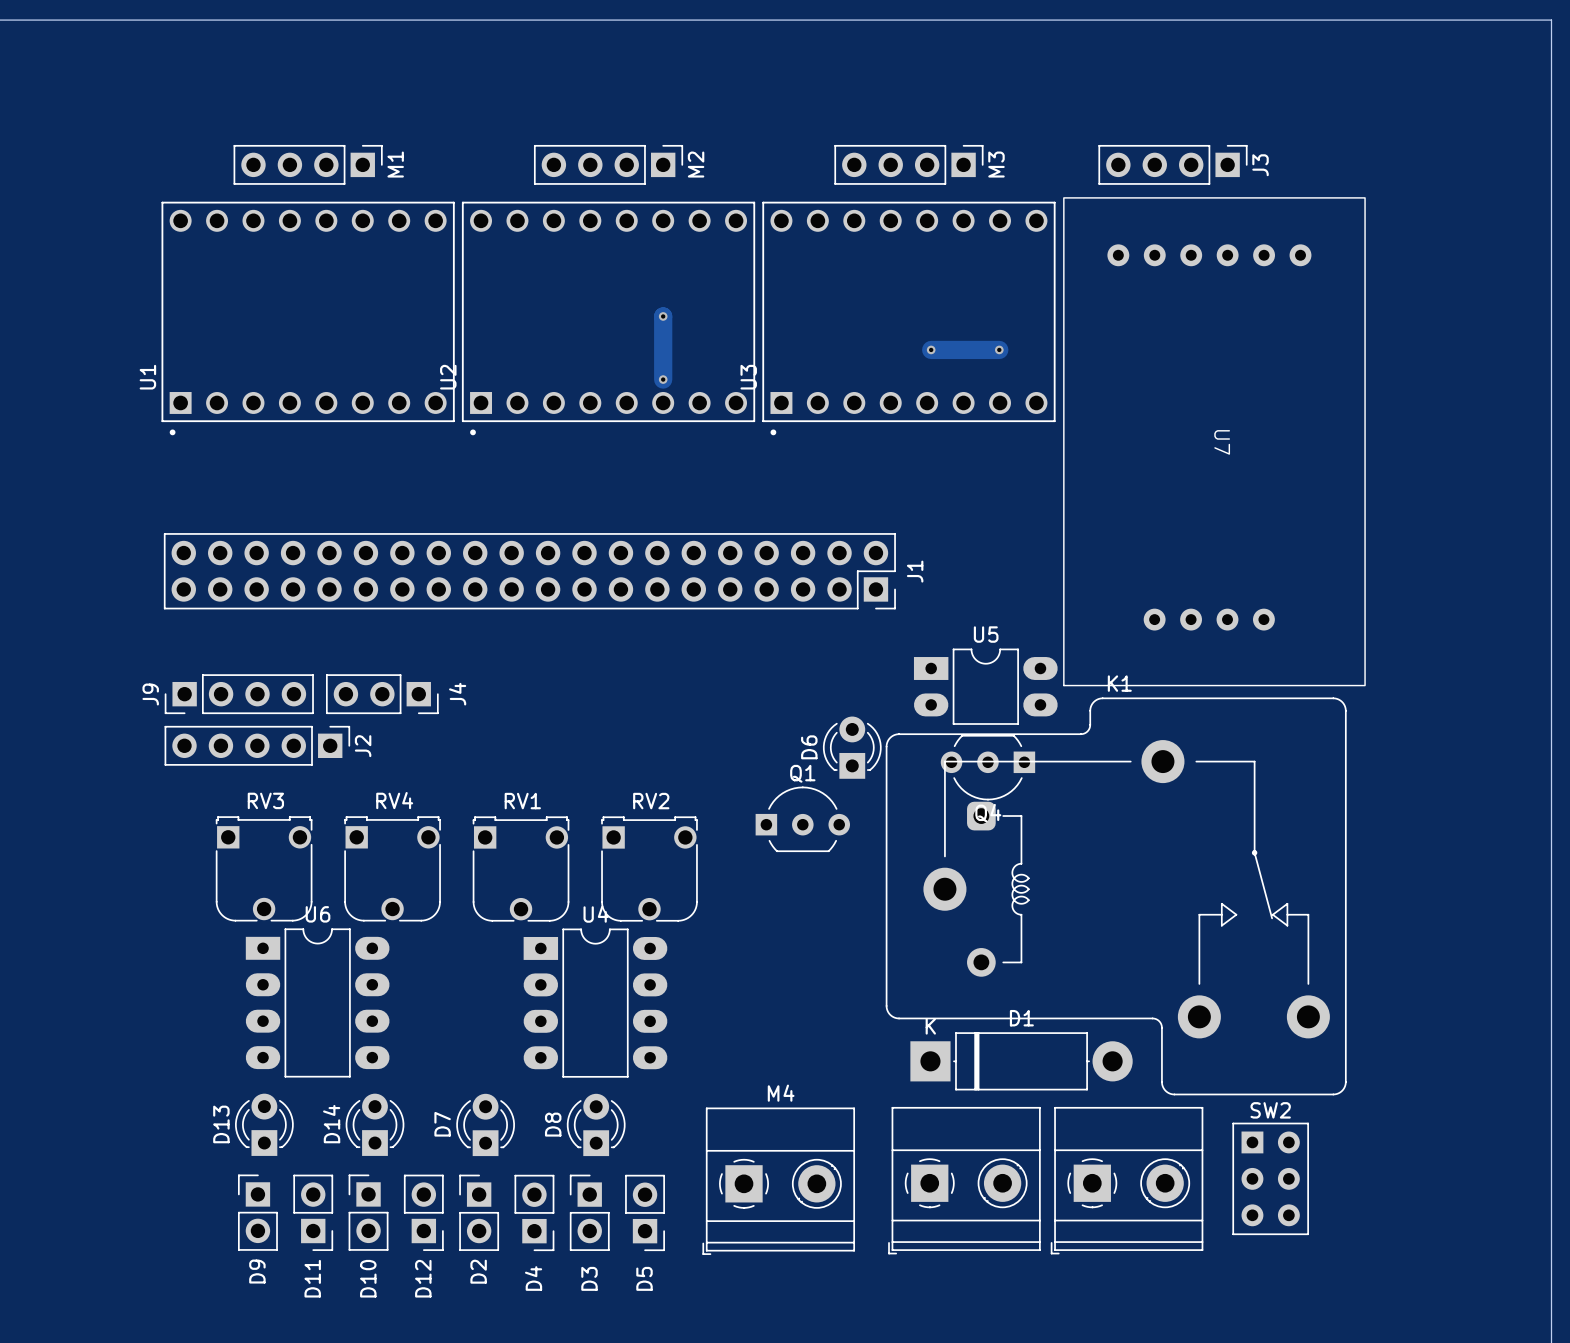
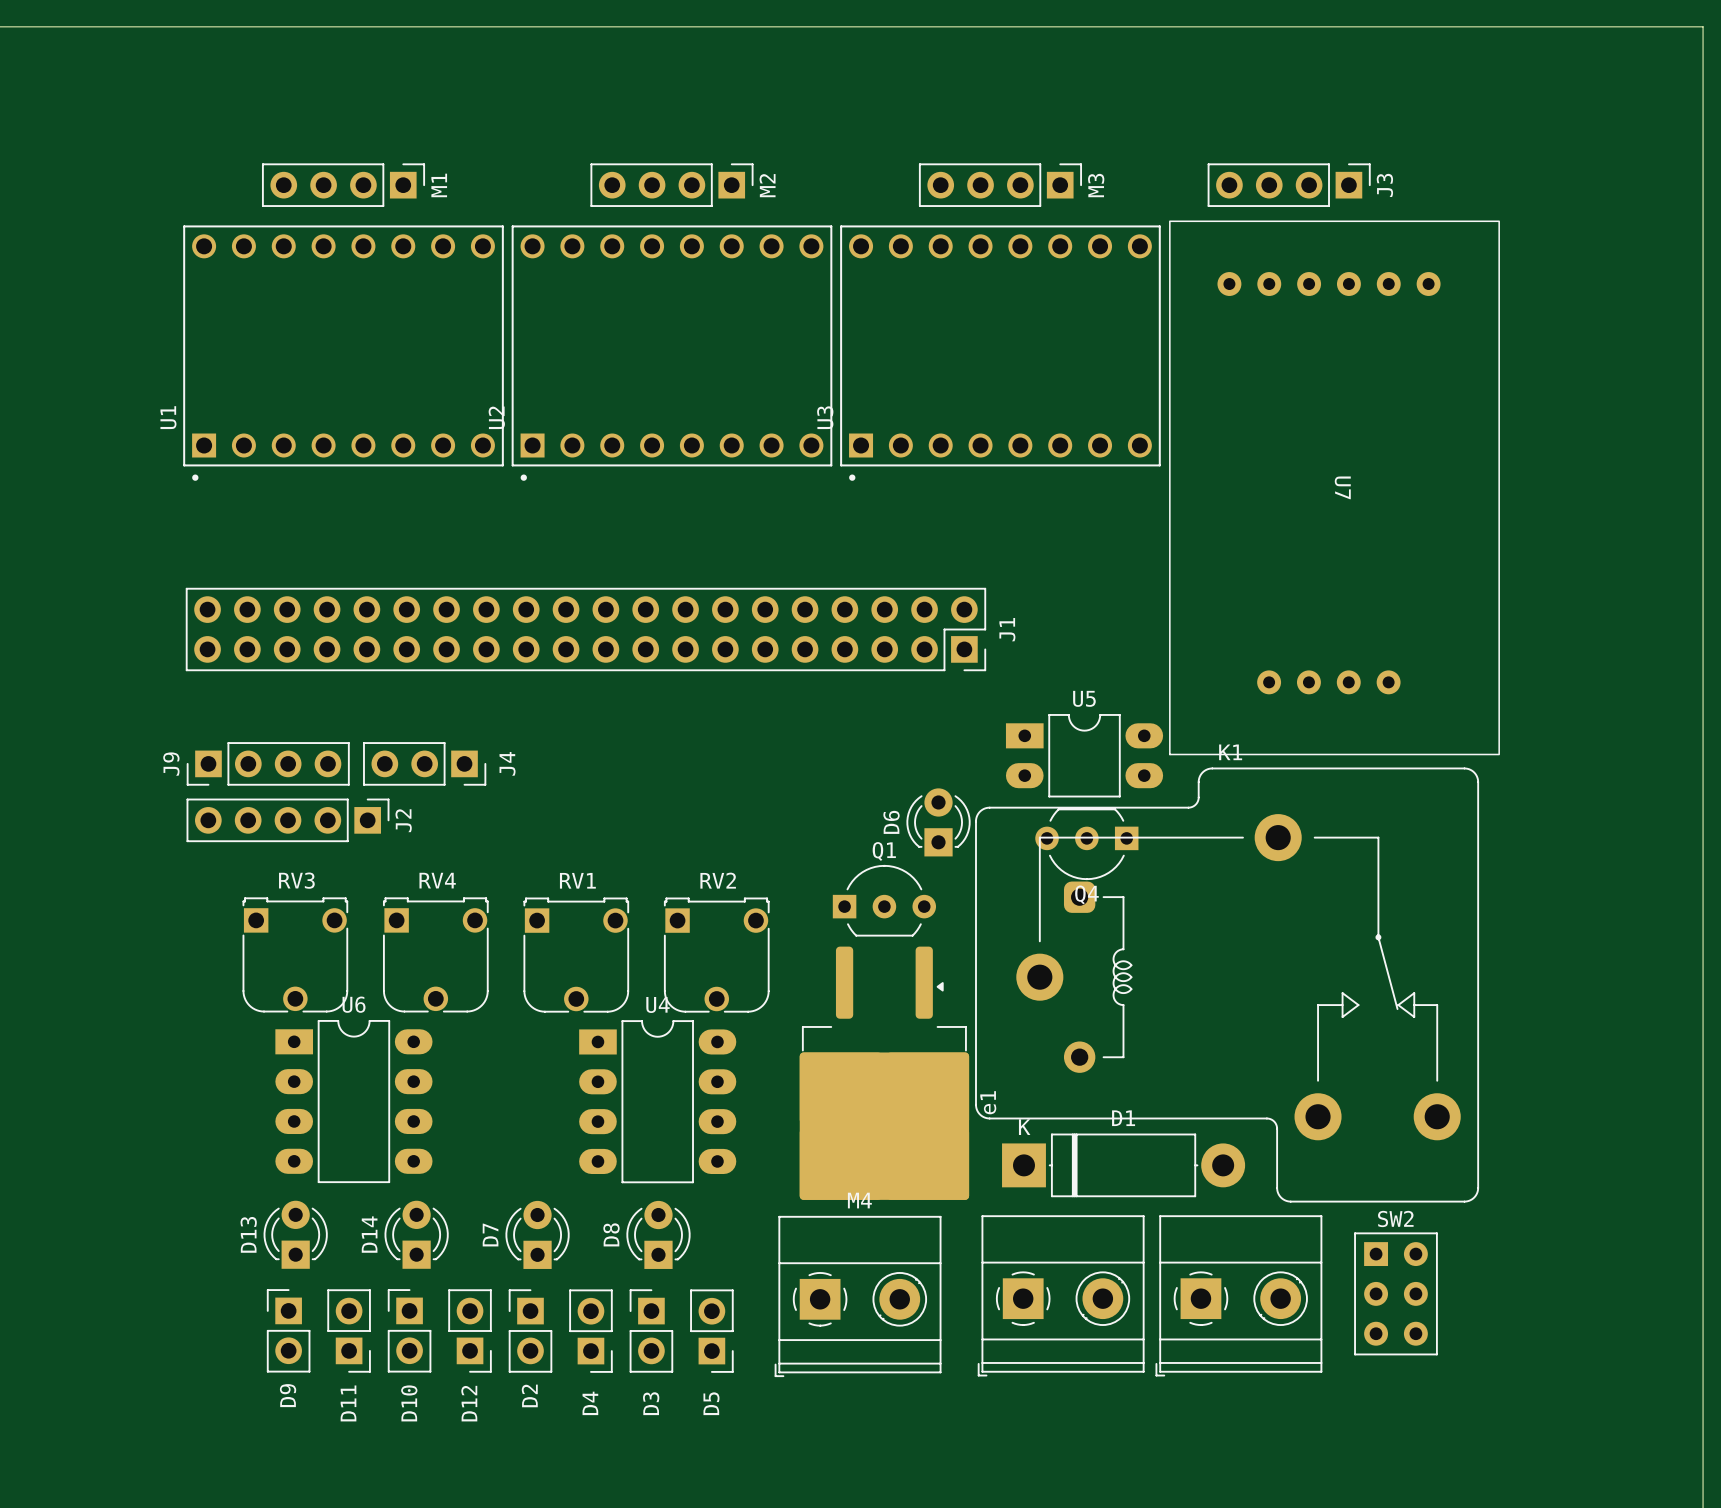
track: (663, 316) (663, 379) -> none
via: (663, 316) -> none
track: (931, 349) (999, 349) -> none
via: (931, 349) -> none
via: (999, 349) -> none
via: (663, 379) -> none
e1: none -> (884, 1073)

